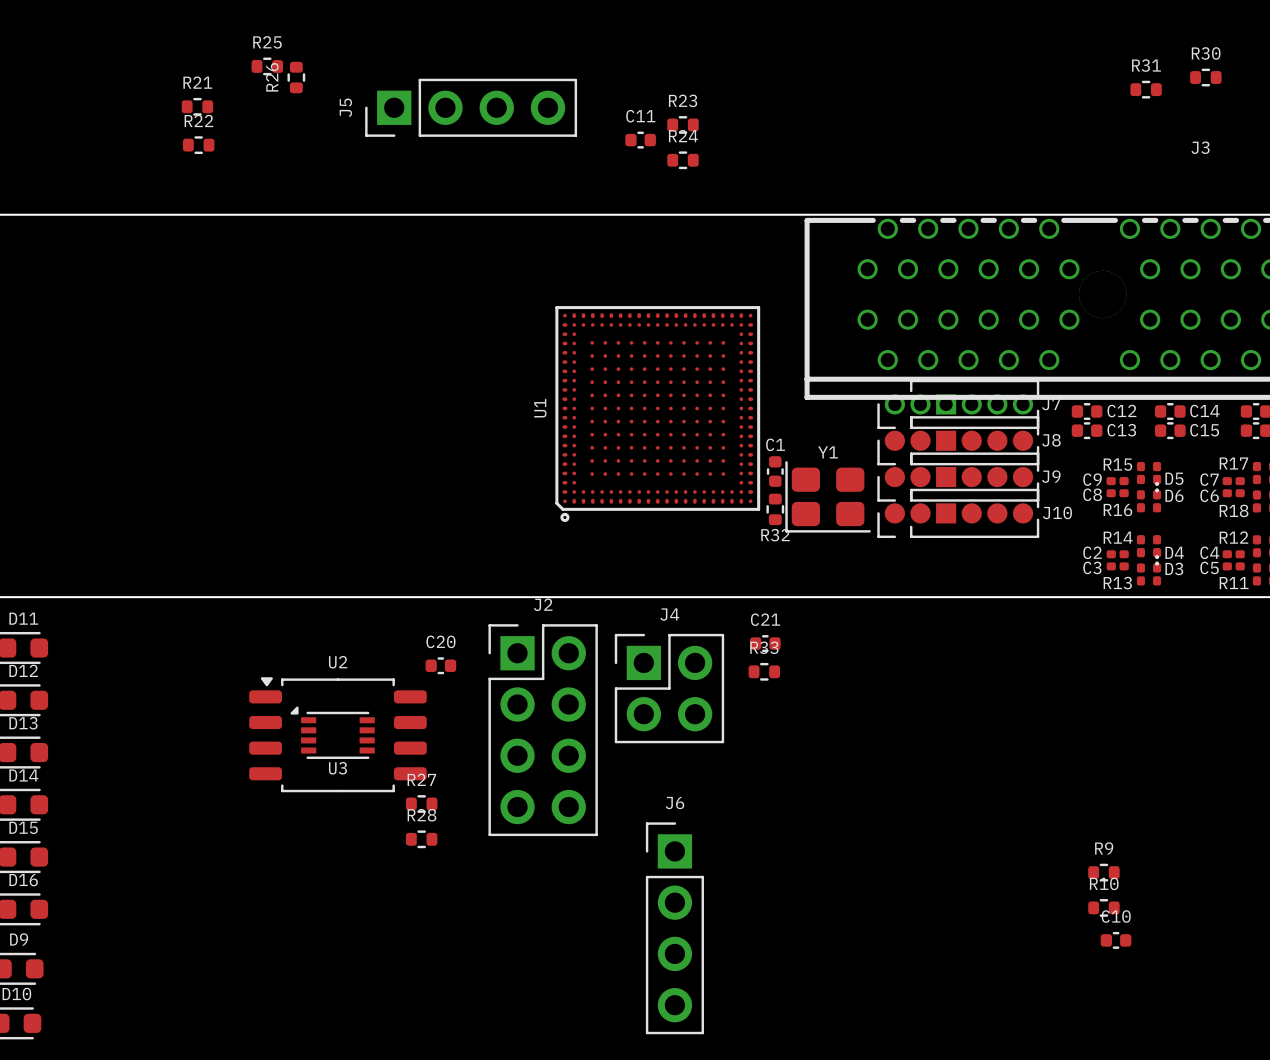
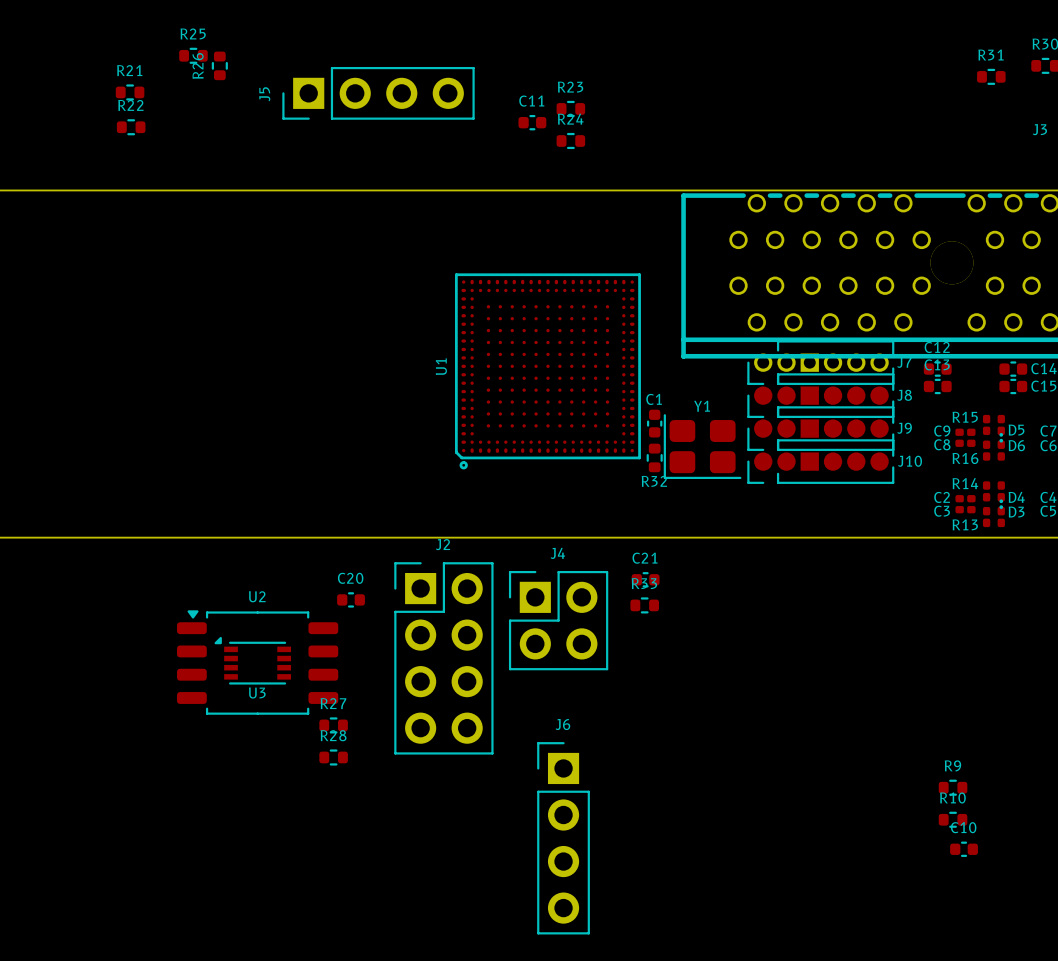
C12 name position: C12 (1121, 411) -> C12 (937, 347)
C13 name position: C13 (1121, 430) -> C13 (937, 364)

